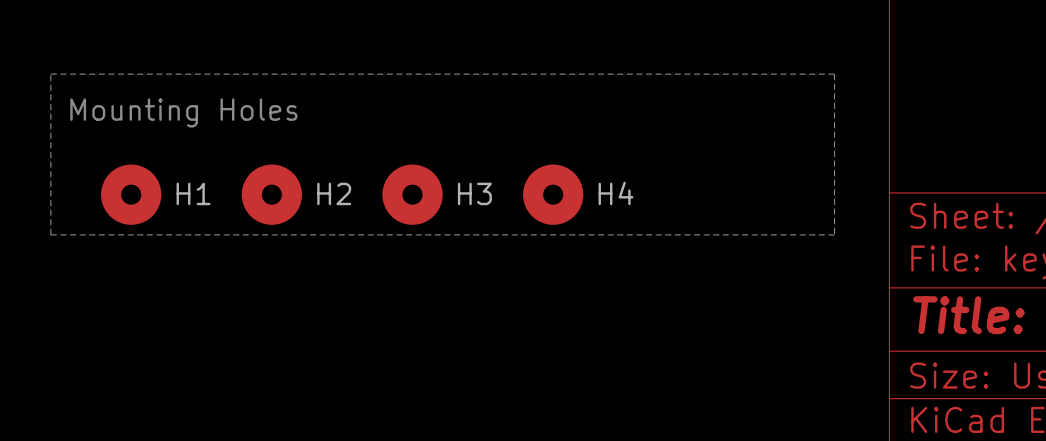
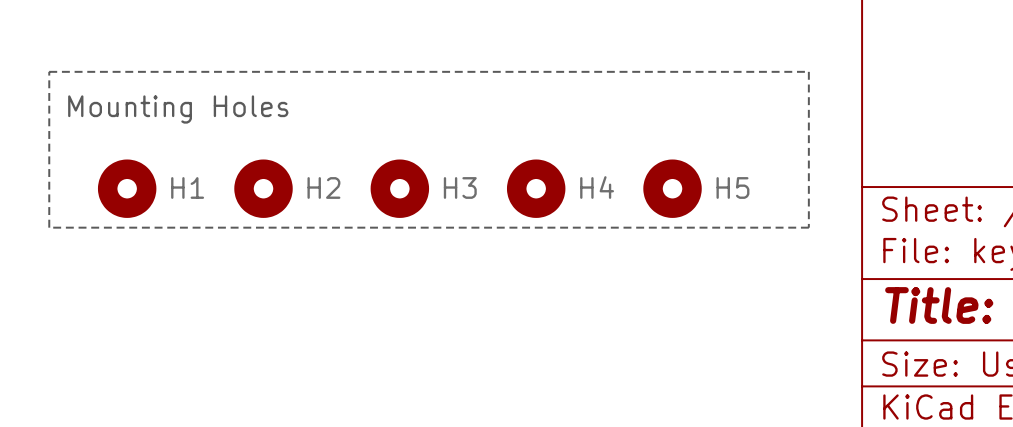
H5: none -> (672, 188)

